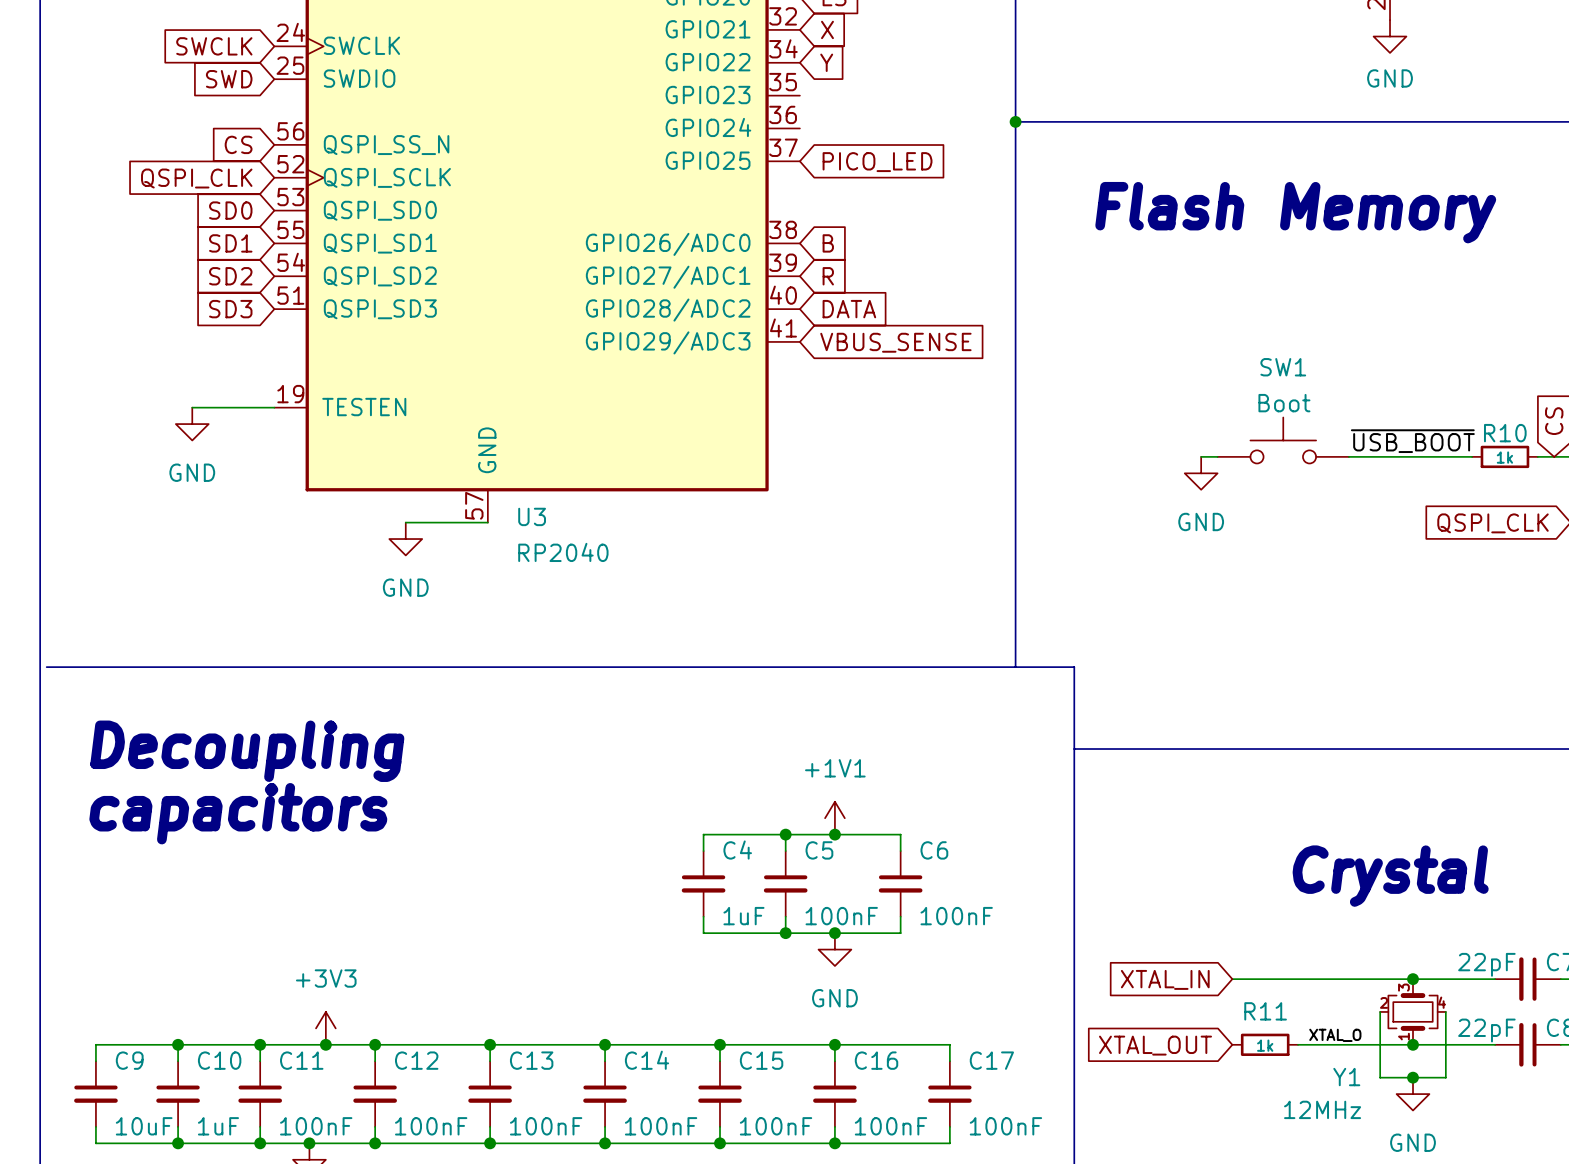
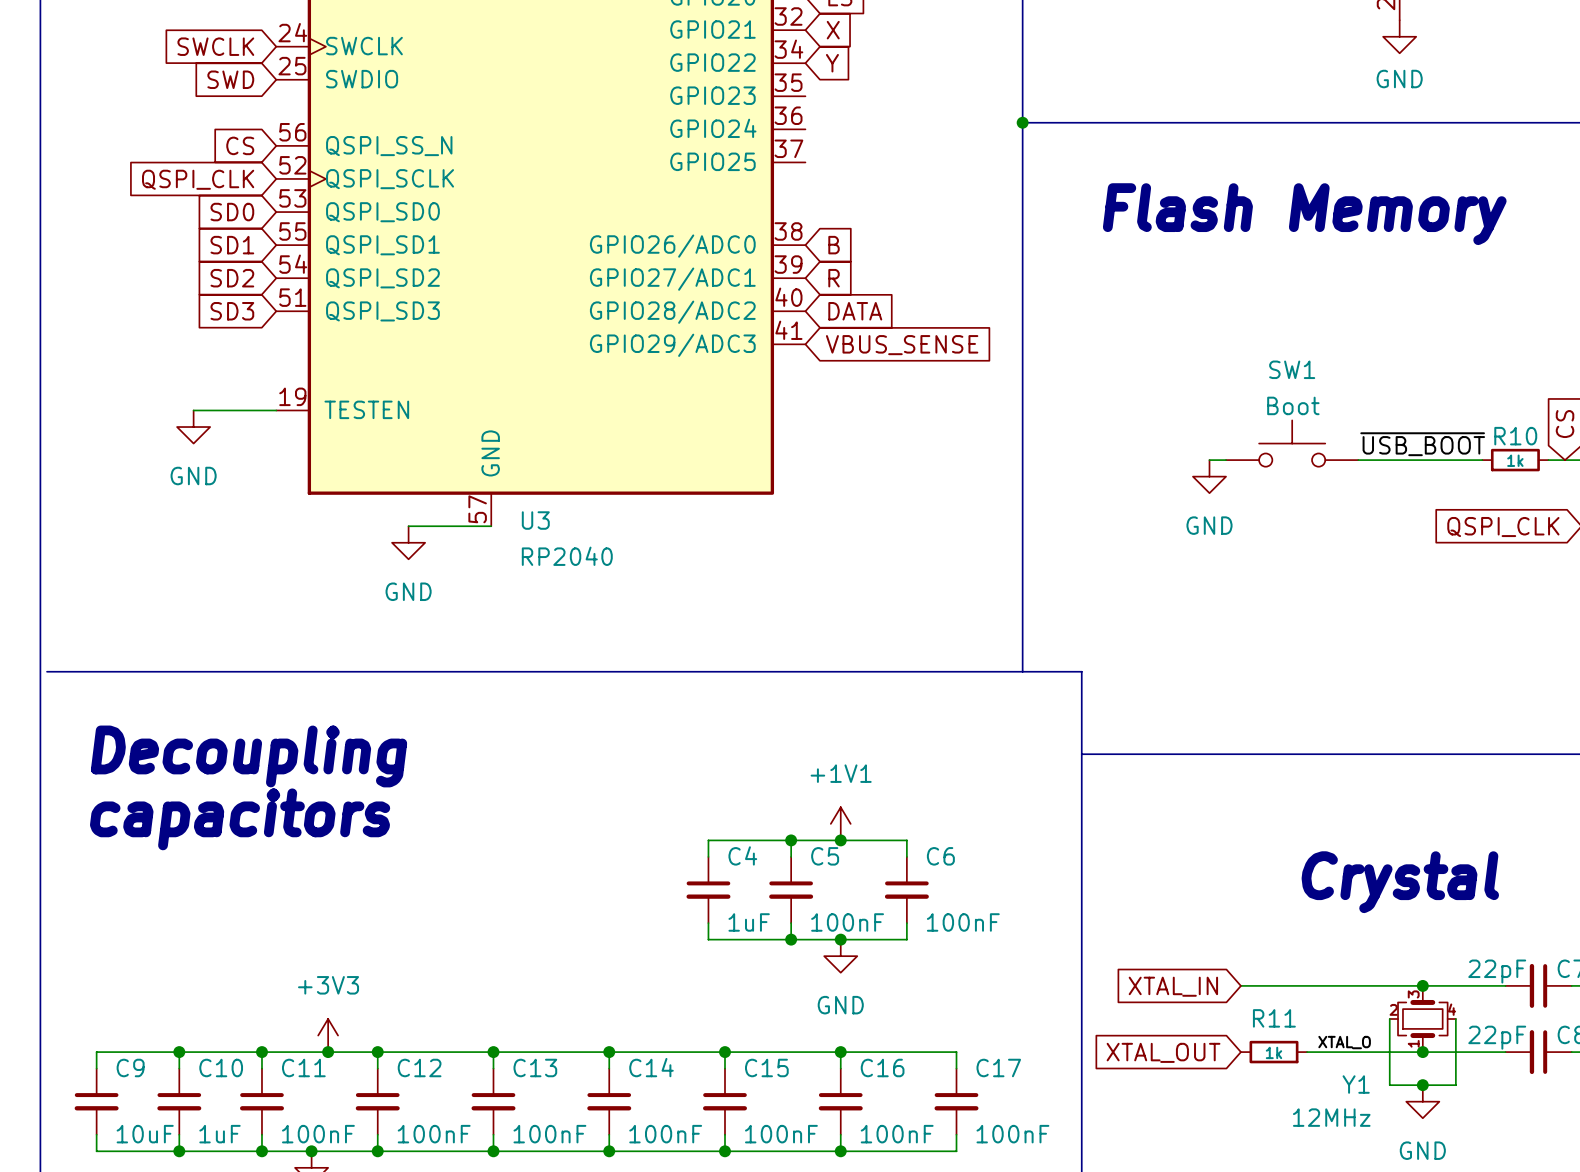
global label: PICO_LED (877, 162) -> none

